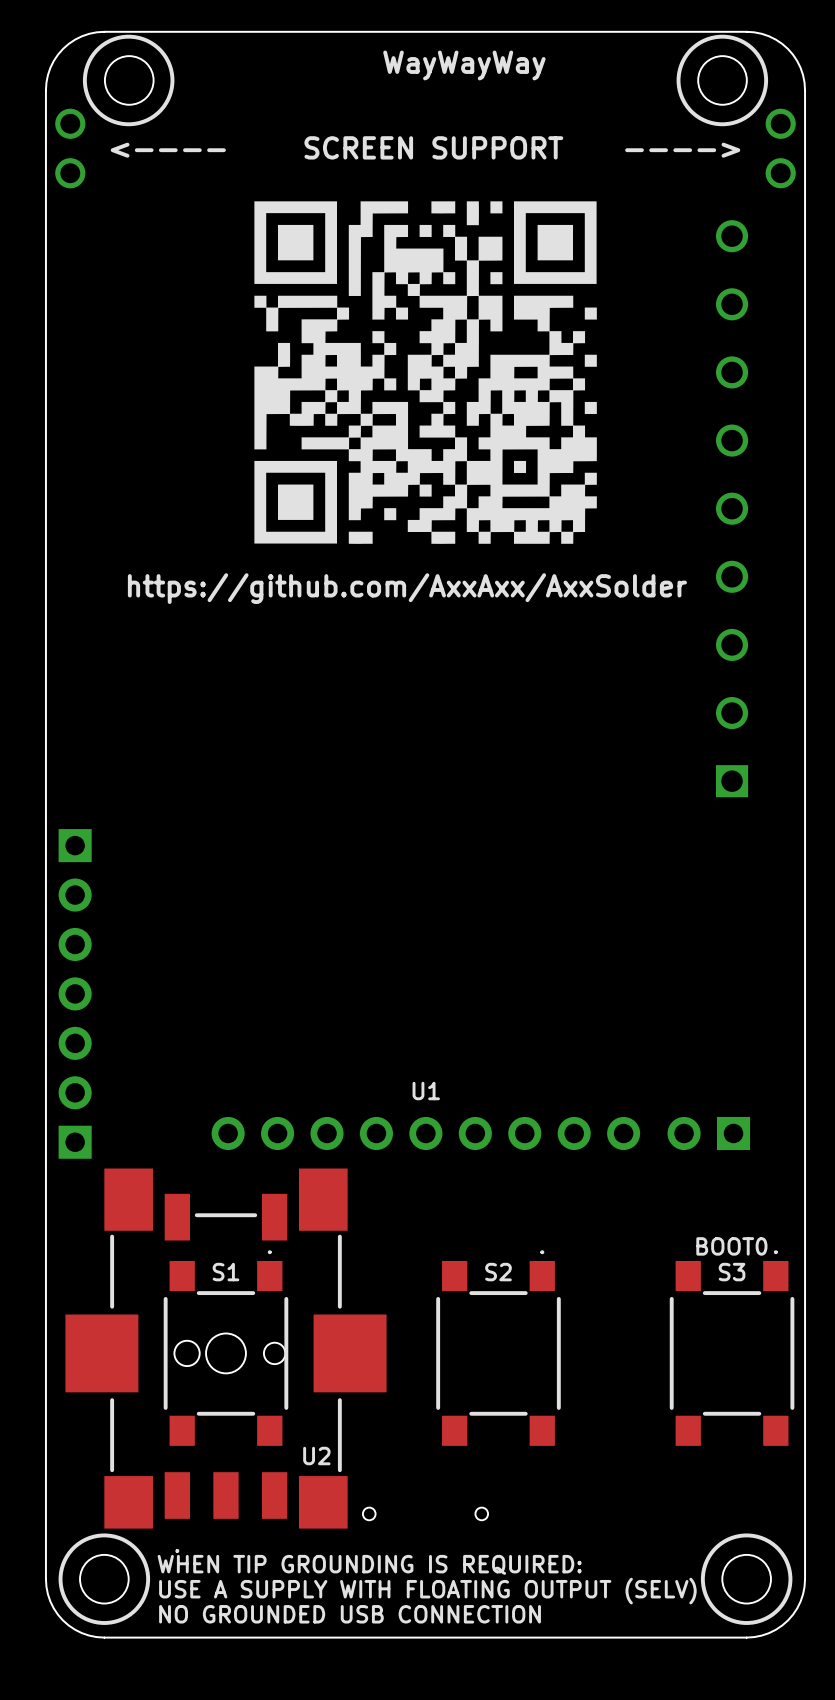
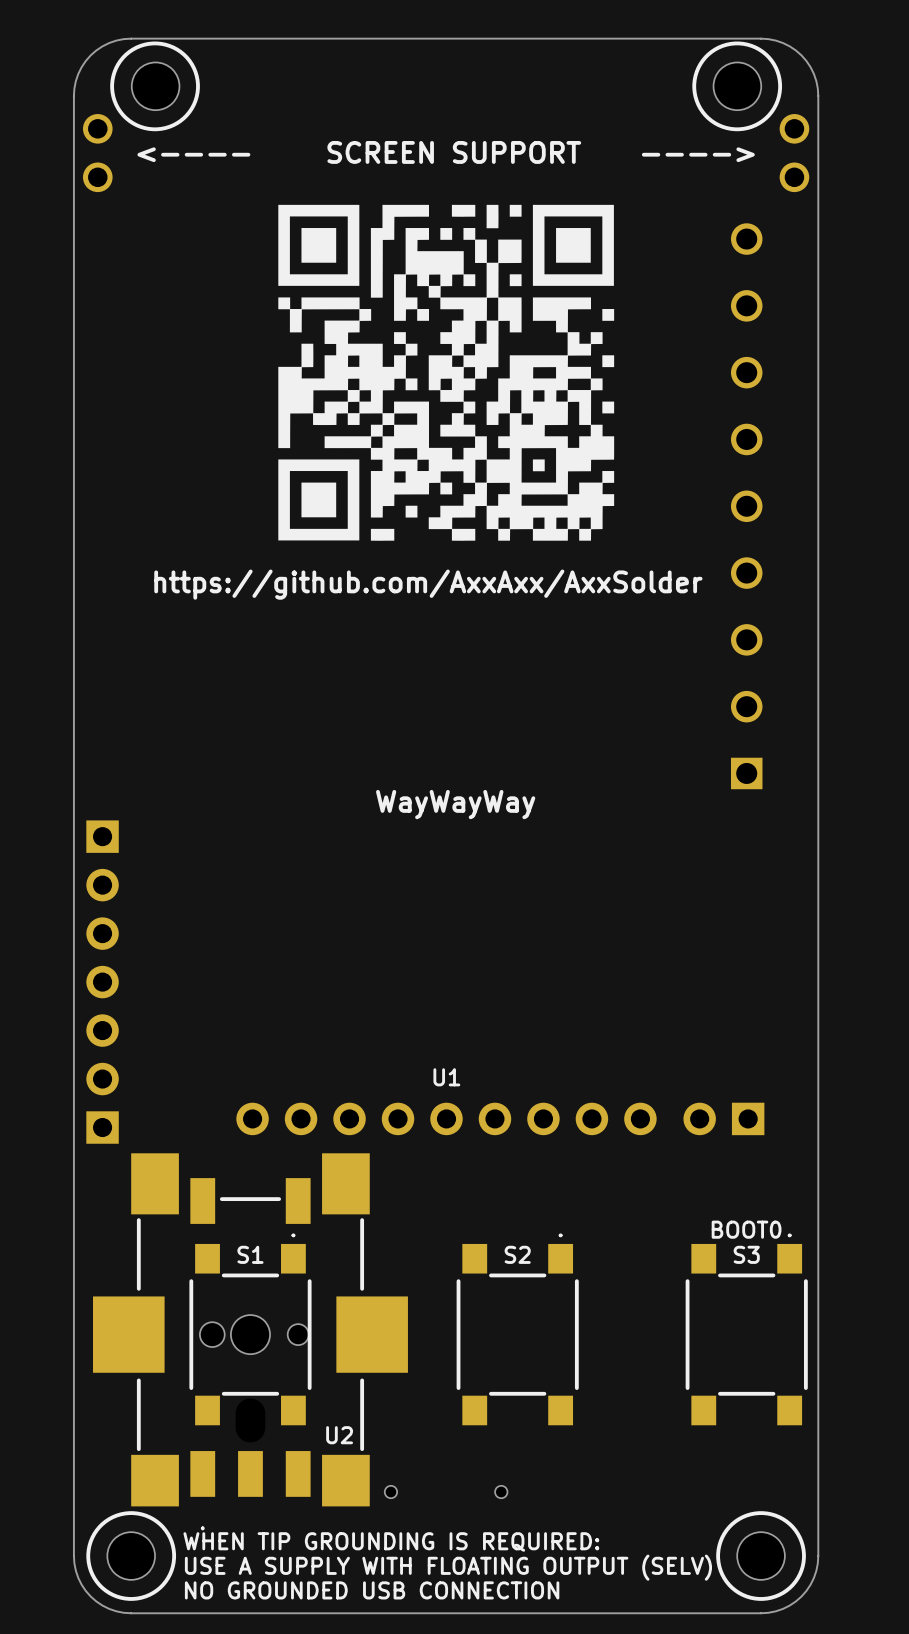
text: WayWayWay (464, 65) -> none
text: none -> WayWayWay (455, 804)

